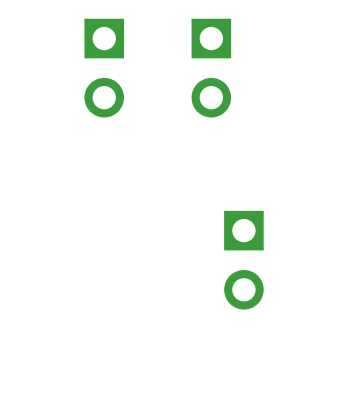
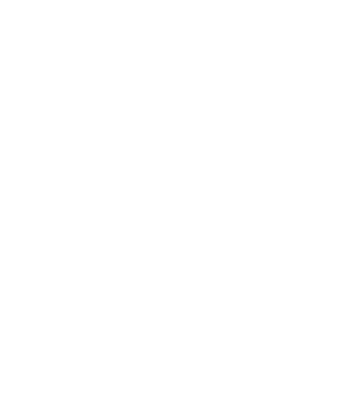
part: (104, 68) -> none
part: (211, 68) -> none
part: (243, 260) -> none

